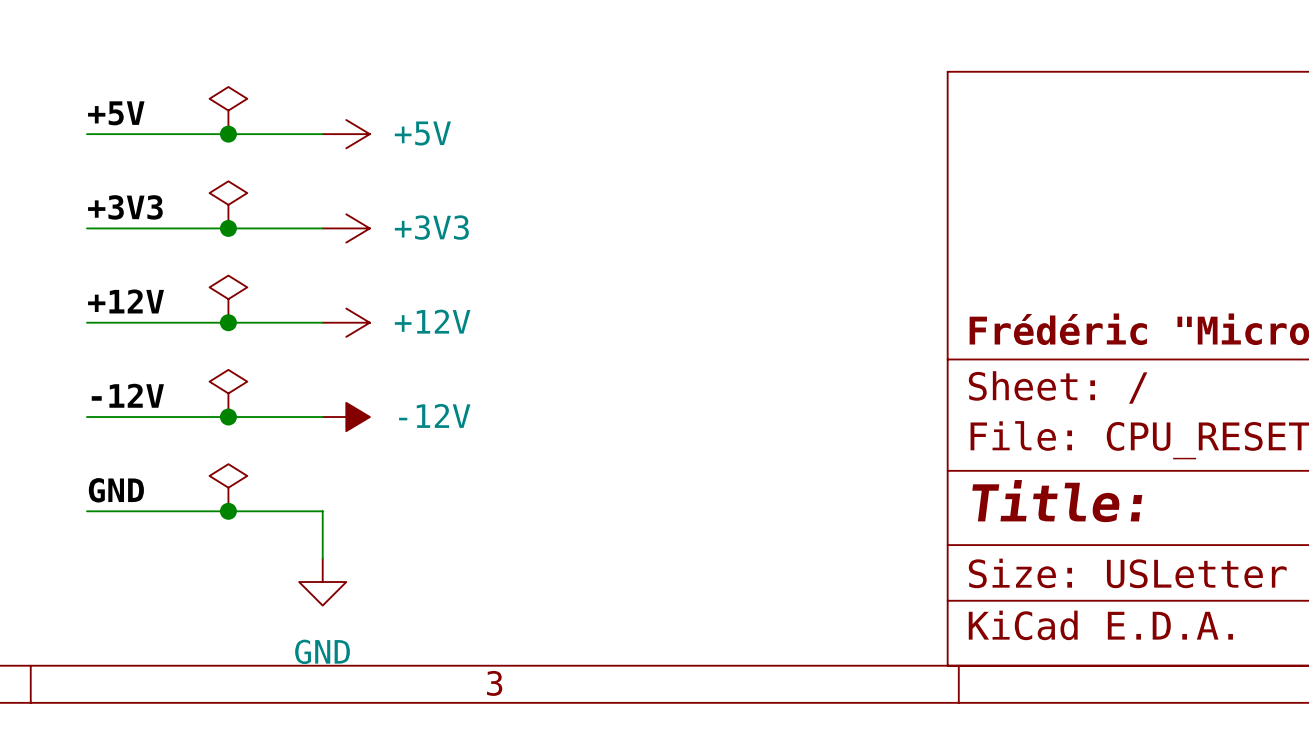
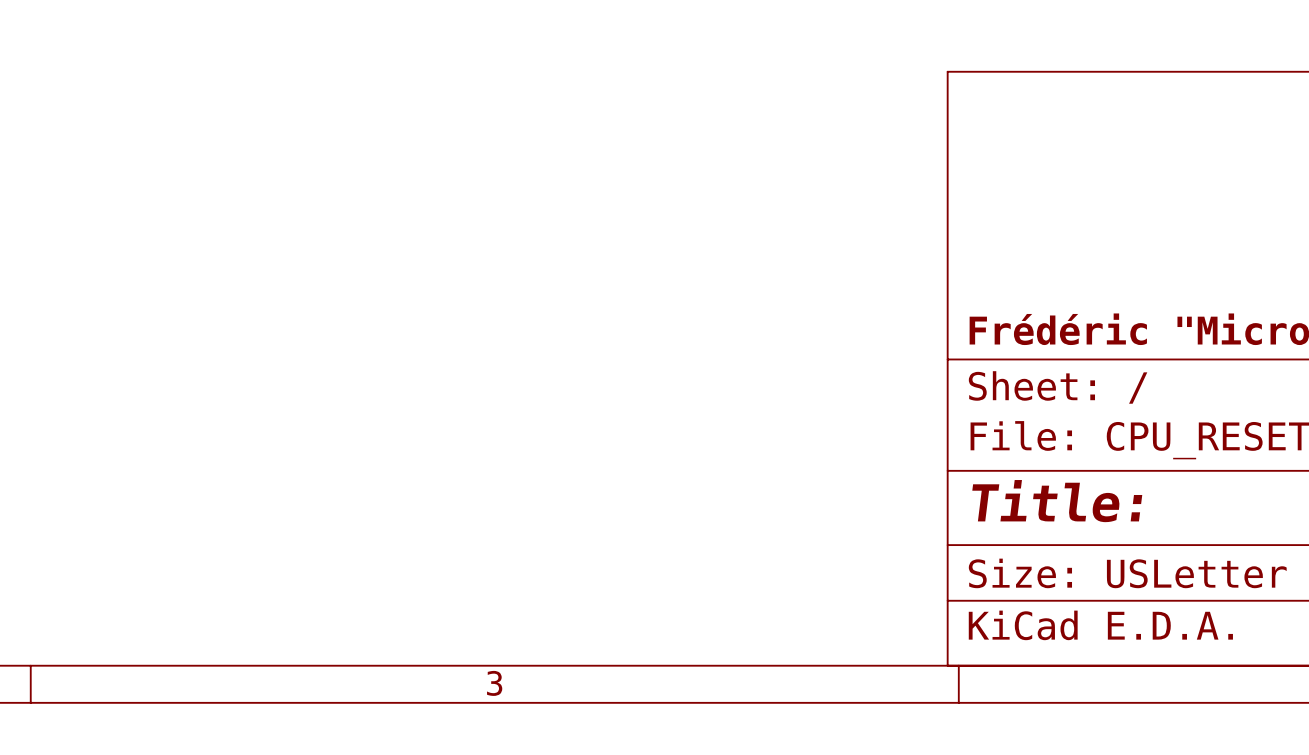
power symbol: (228, 110) -> none
label: +5V (116, 113) -> none
wire: (86, 134) (322, 134) -> none
junction: (228, 134) -> none
power symbol: +5V (346, 134) -> none
power symbol: (228, 204) -> none
label: +3V3 (125, 207) -> none
wire: (86, 228) (322, 228) -> none
junction: (228, 228) -> none
power symbol: +3V3 (346, 228) -> none
power symbol: (228, 299) -> none
label: +12V (126, 301) -> none
wire: (86, 322) (322, 322) -> none
junction: (228, 322) -> none
power symbol: +12V (346, 322) -> none
power symbol: (228, 393) -> none
label: -12V (127, 395) -> none
wire: (86, 417) (322, 417) -> none
junction: (228, 417) -> none
power symbol: -12V (346, 417) -> none
power symbol: (228, 487) -> none
label: GND (116, 490) -> none
wire: (86, 511) (322, 511) (322, 558) -> none
junction: (228, 511) -> none
power symbol: GND (322, 582) -> none

